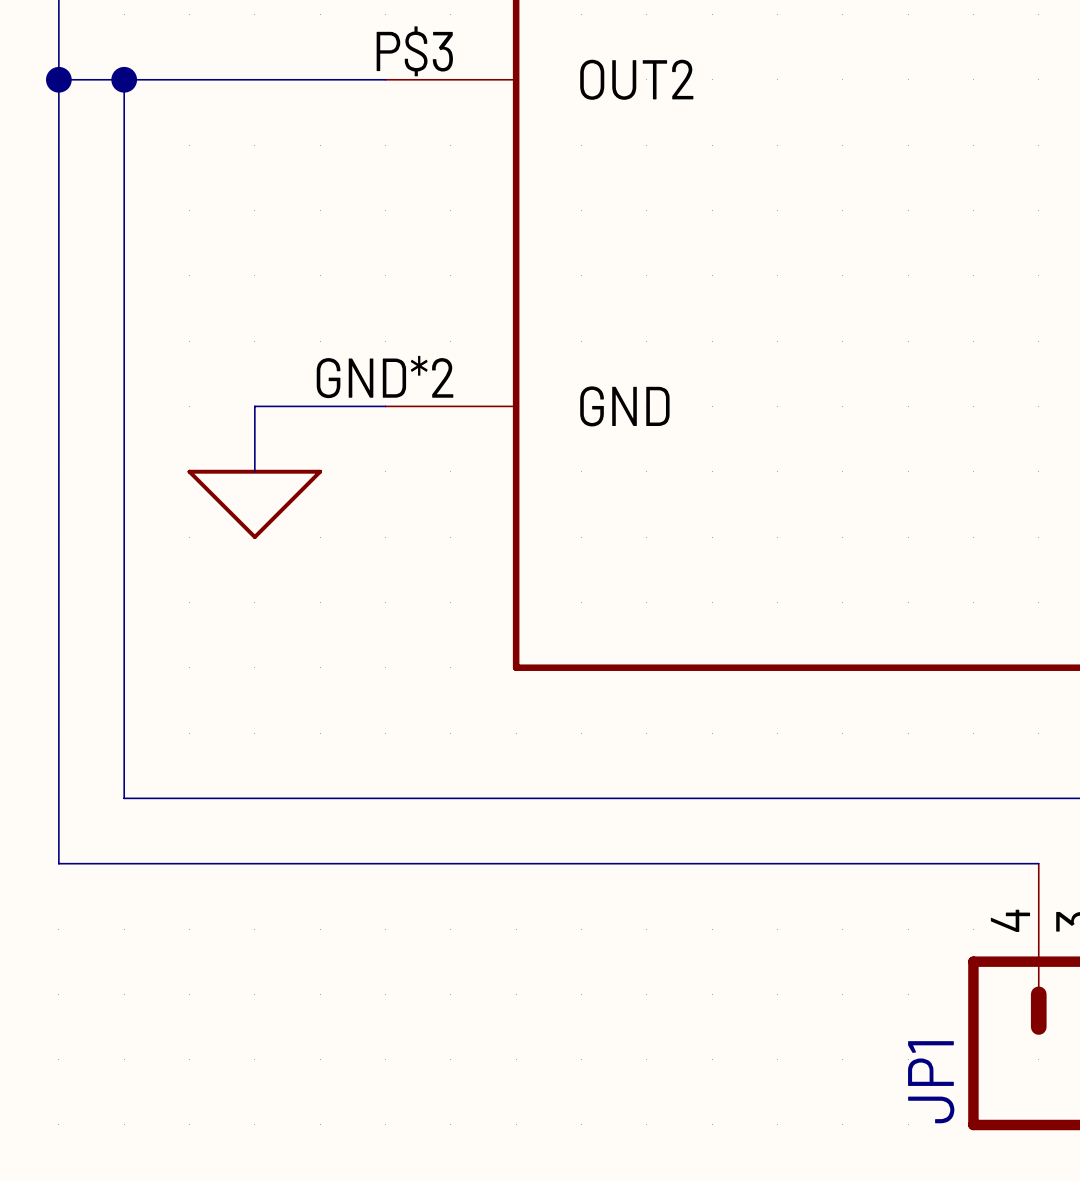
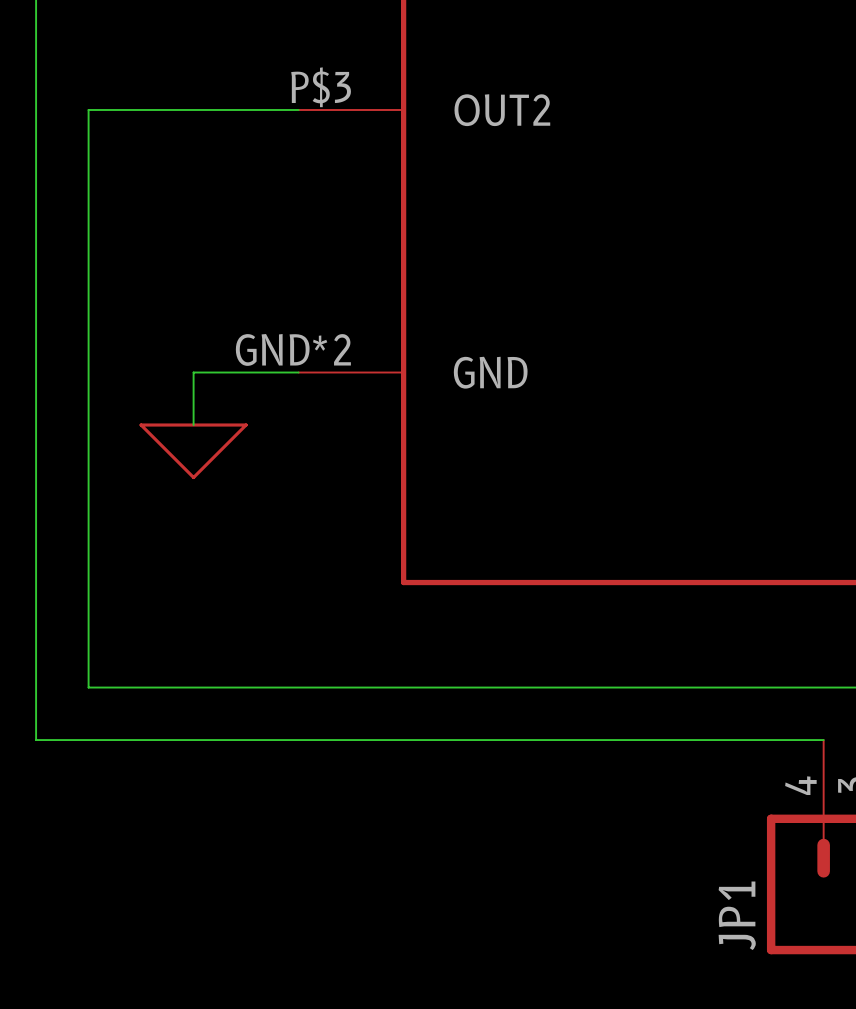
wire: (58, 79) (124, 79) -> none
junction: (58, 79) -> none
junction: (124, 79) -> none

